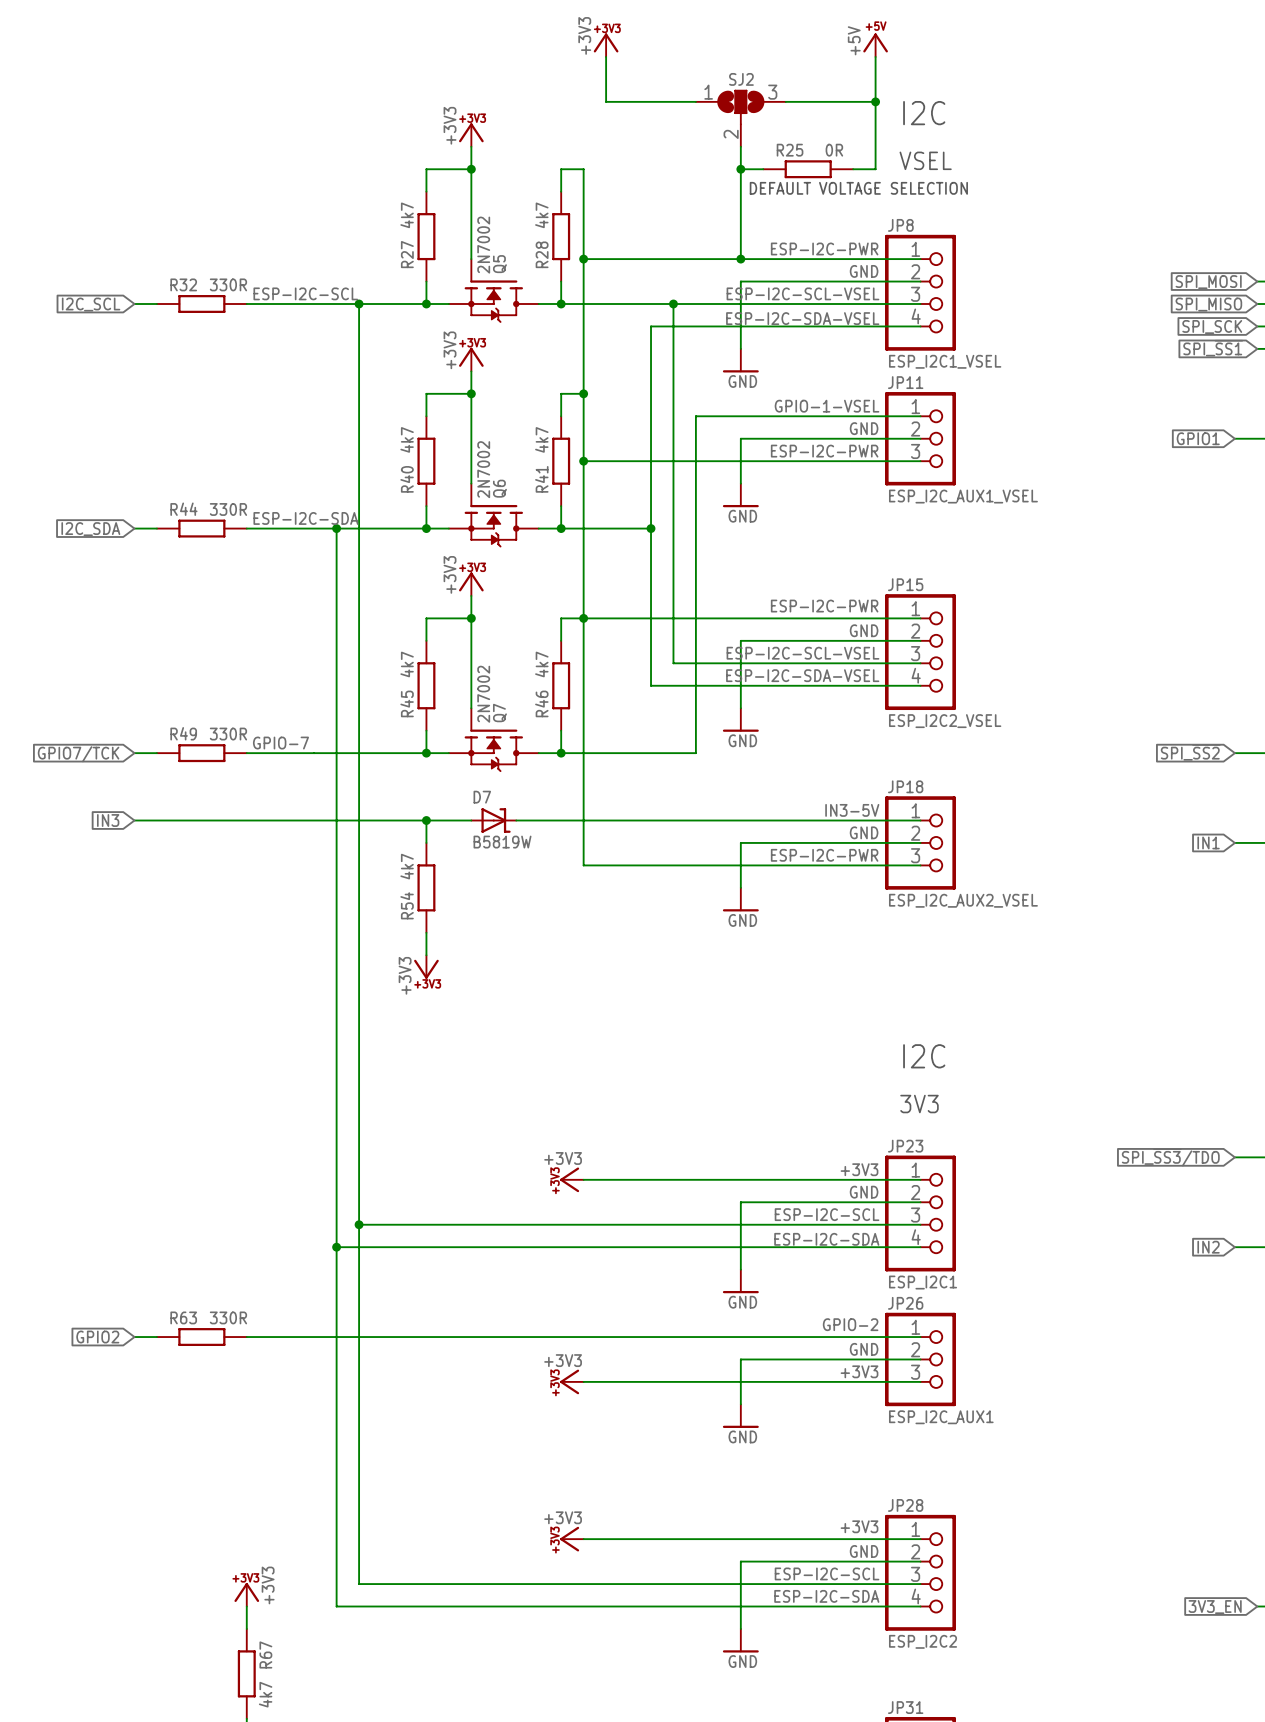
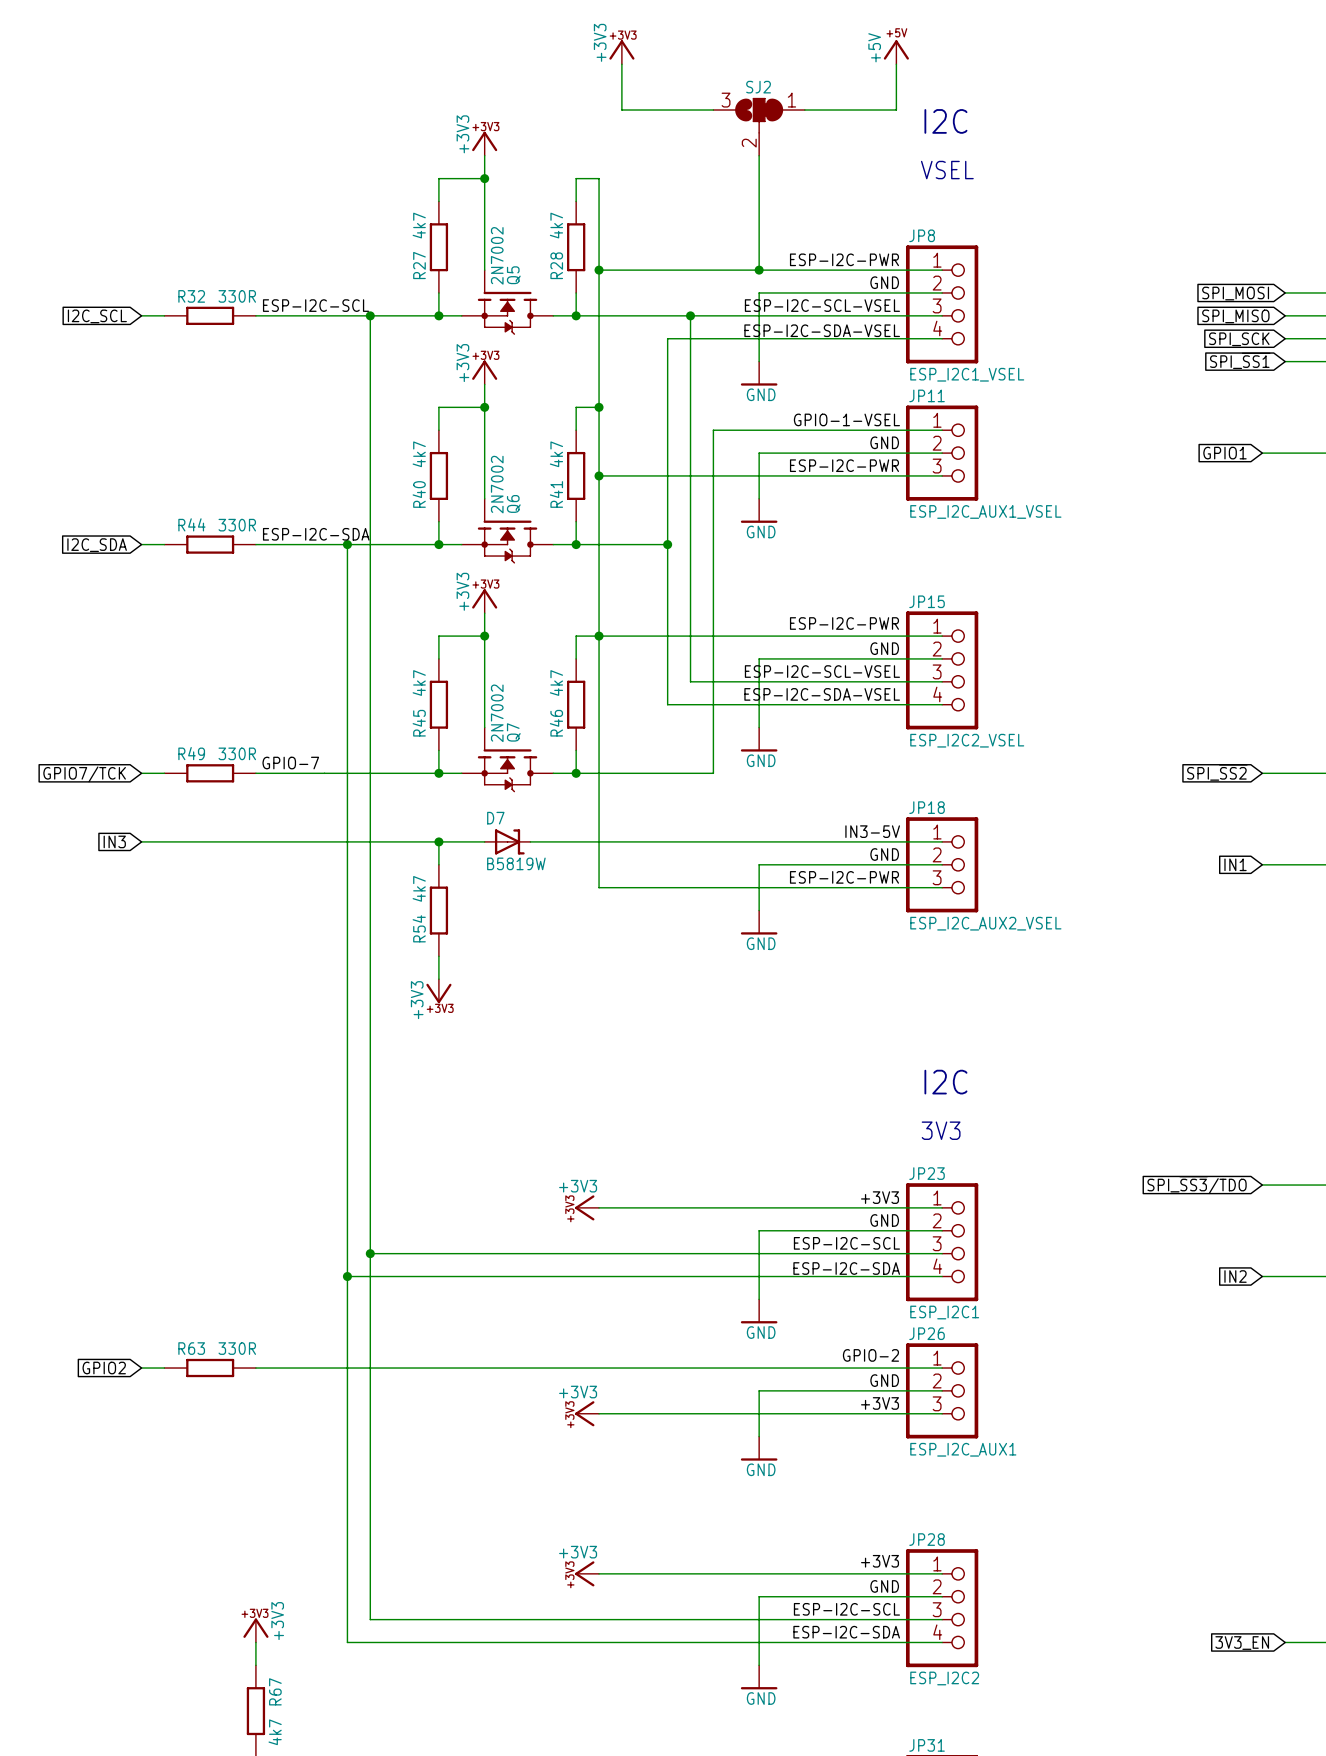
SJ2 symbol: [695, 89, 786, 147] -> [713, 97, 805, 156]
wire: (875, 101) (875, 169) (853, 169) -> none
junction: (875, 101) -> none
wire: (740, 169) (763, 169) -> none
junction: (740, 169) -> none
R25: 0R (808, 169) -> none
text: DEFAULT VOLTAGE SELECTION (858, 188) -> none

